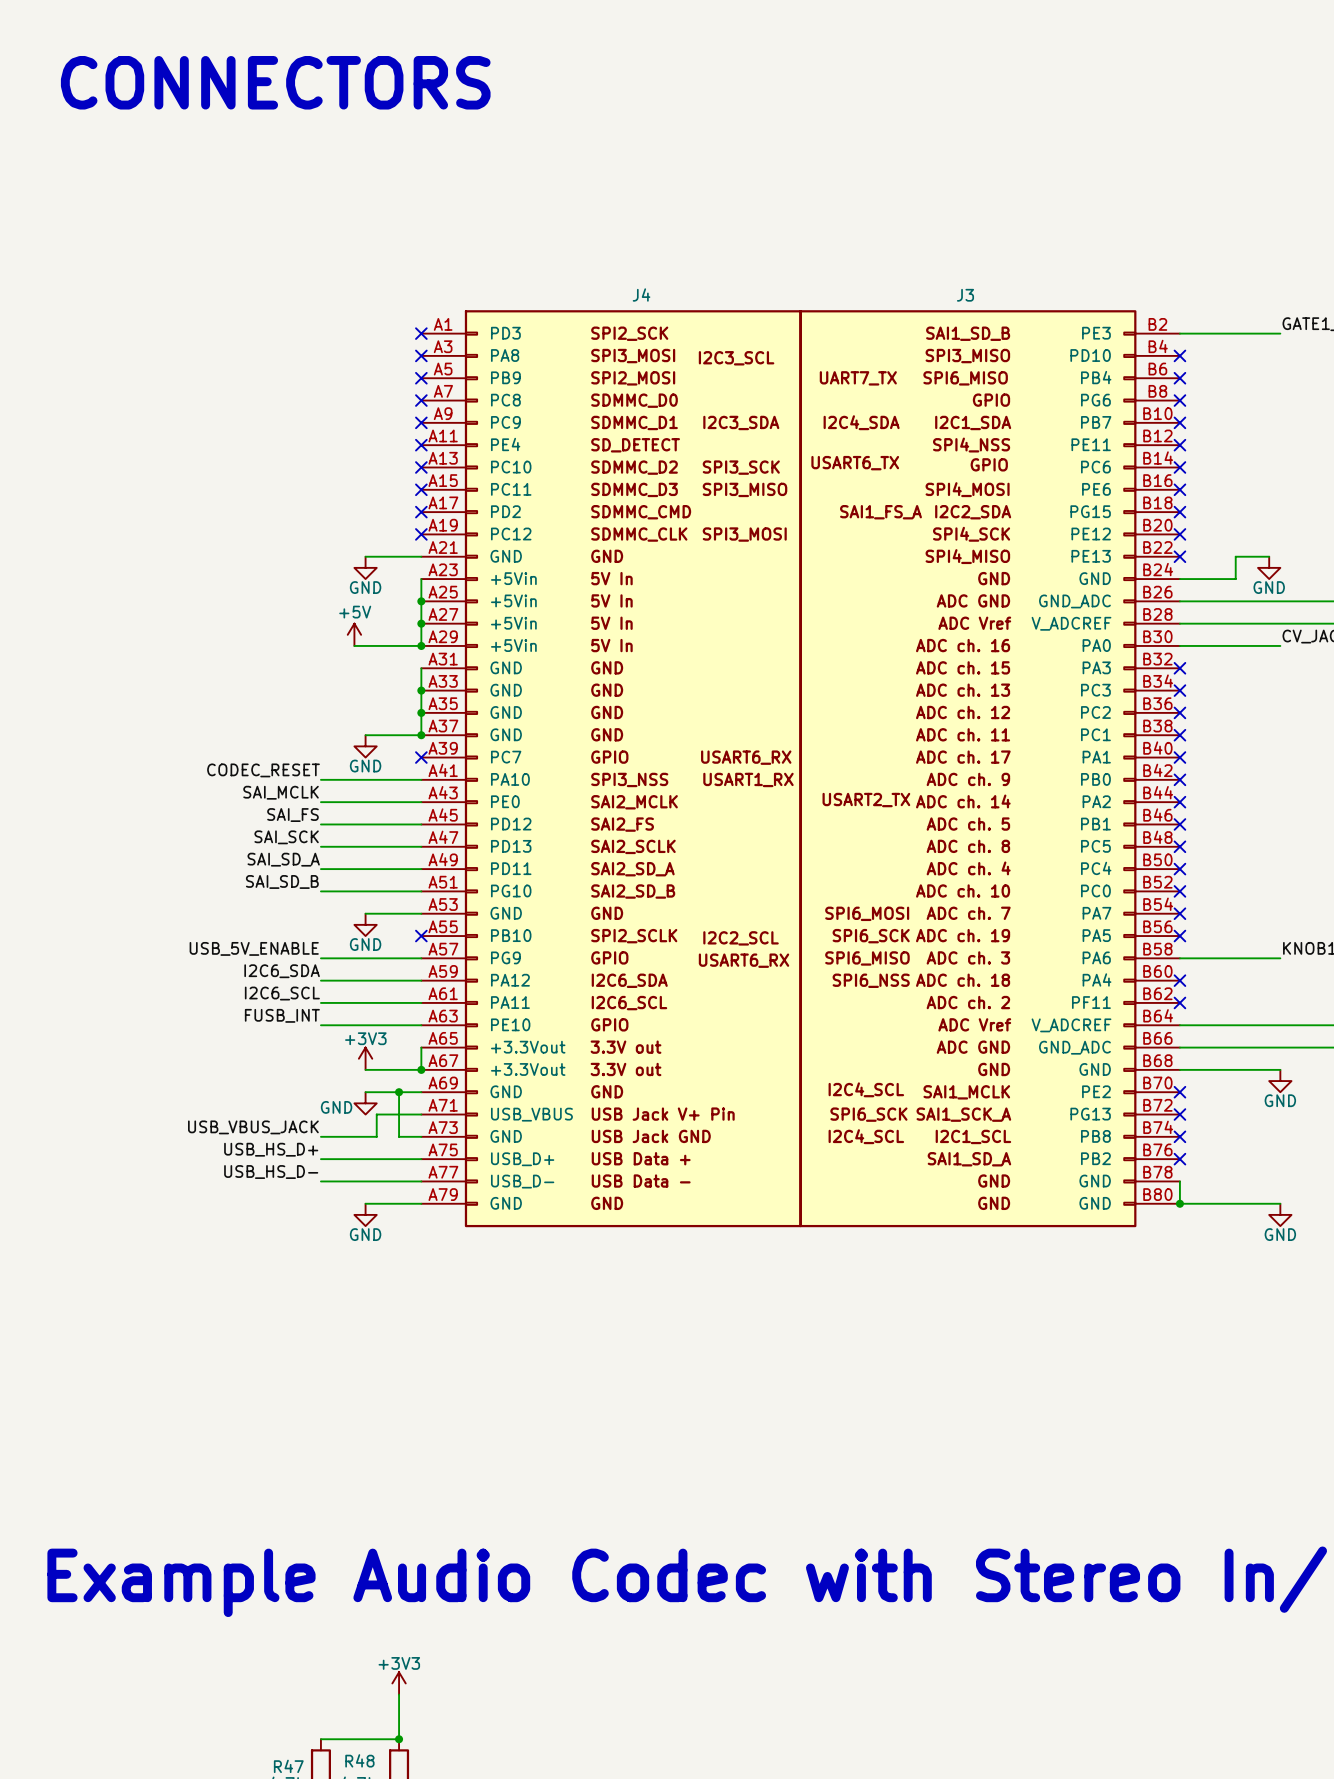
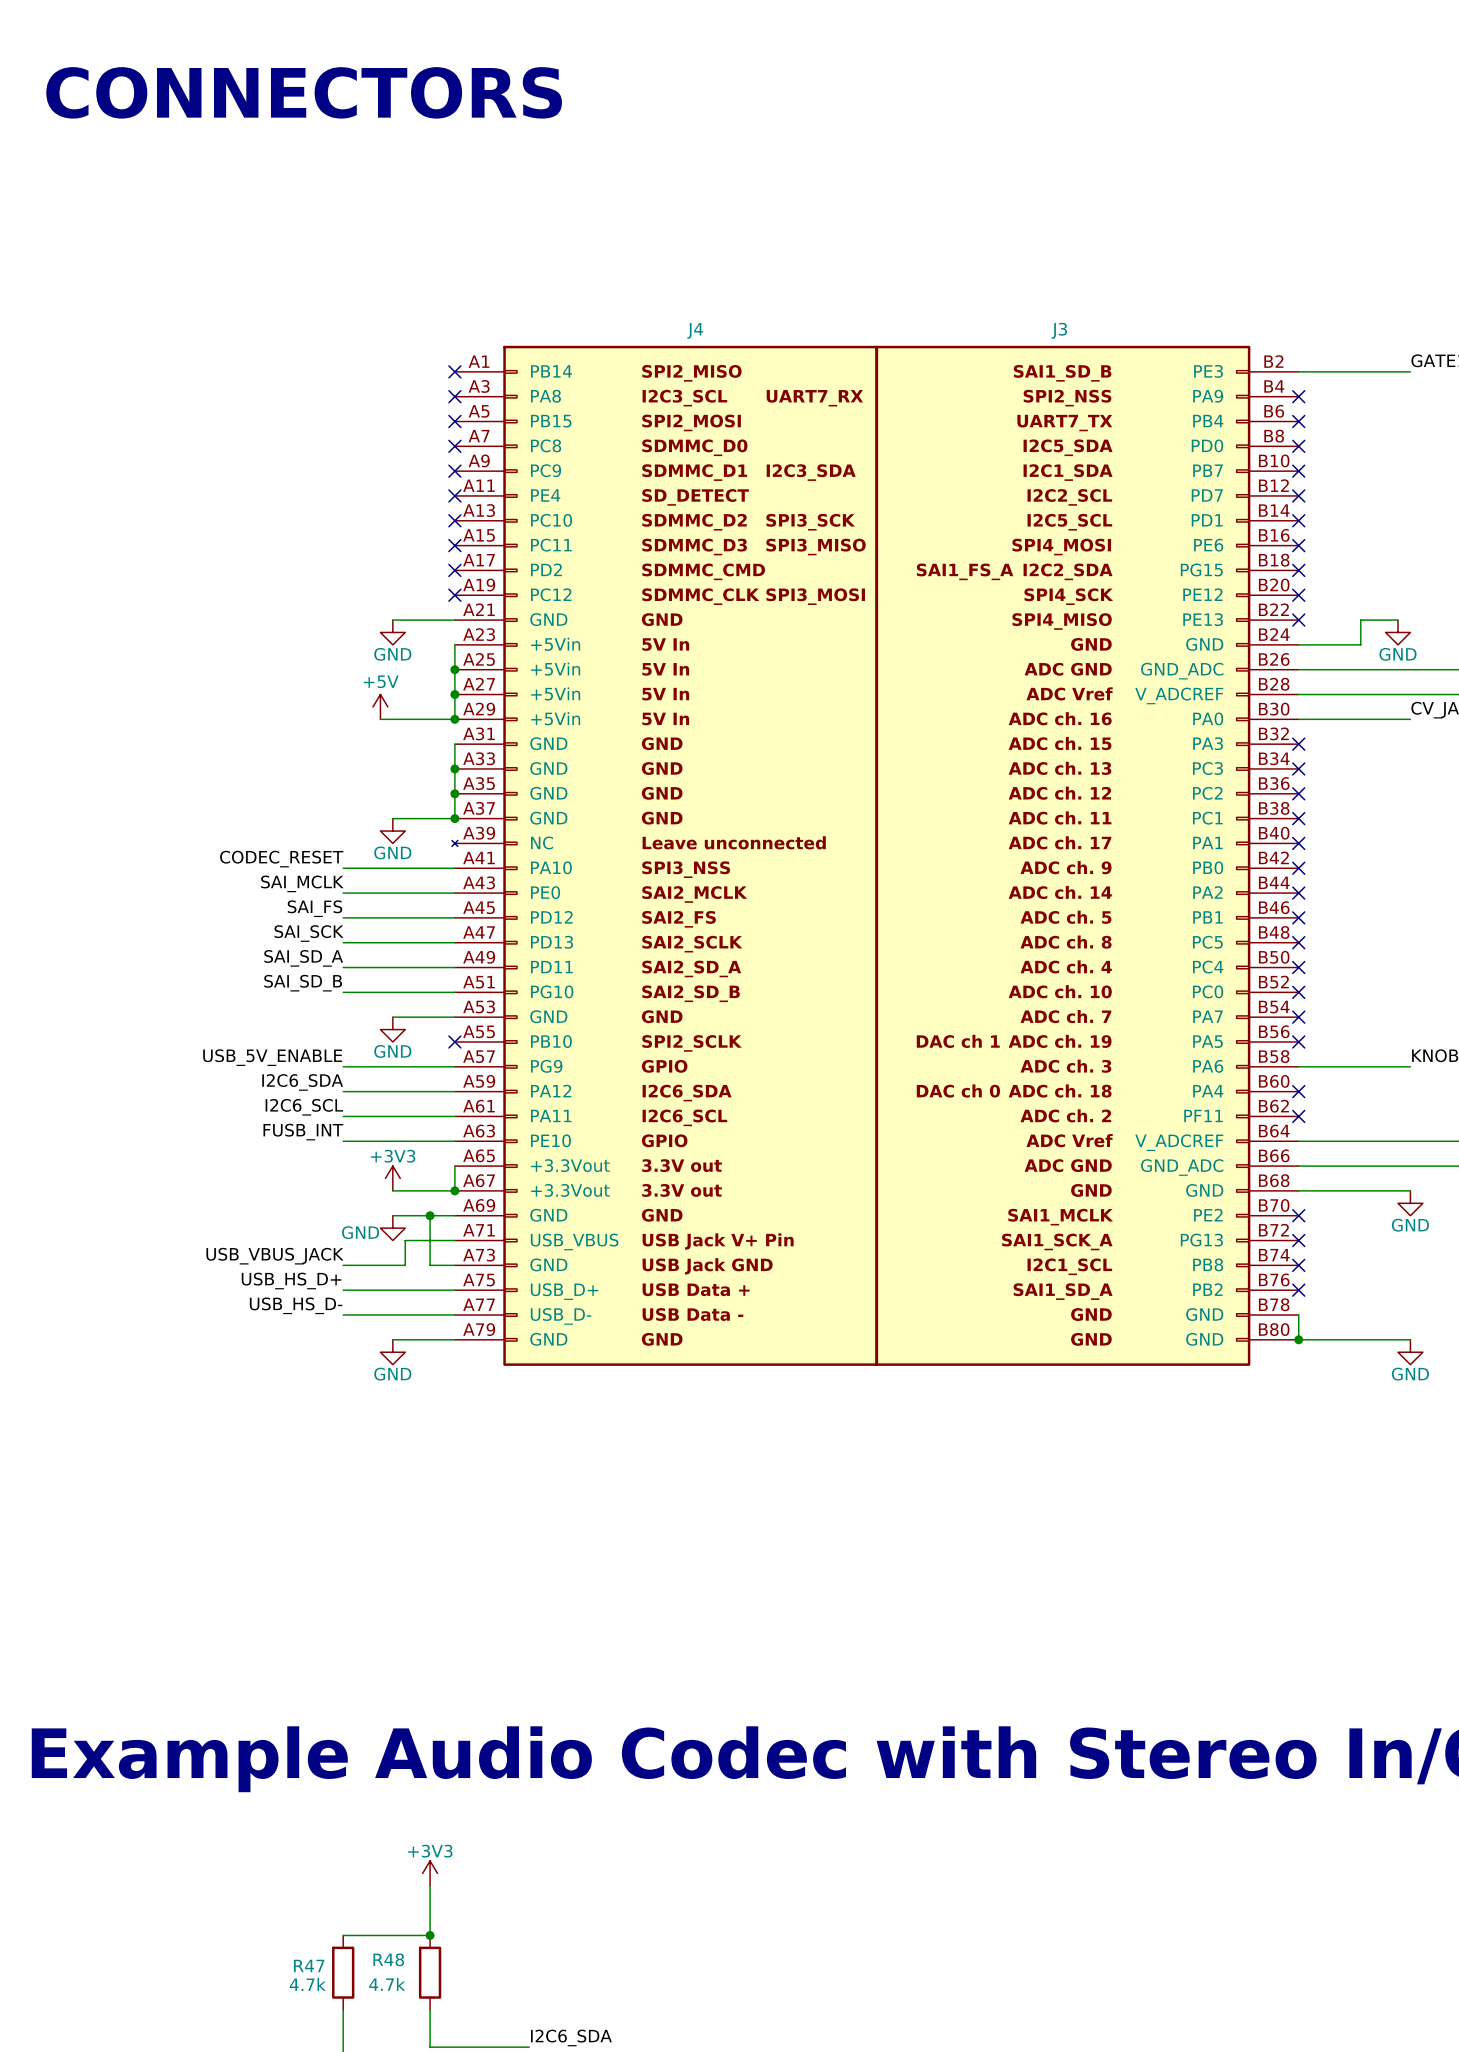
J4 symbol: [421, 310, 802, 1228] -> [451, 345, 879, 1366]
J3 symbol: [799, 310, 1180, 1228] -> [875, 345, 1299, 1366]
no-connect mark: (421, 757) -> none

